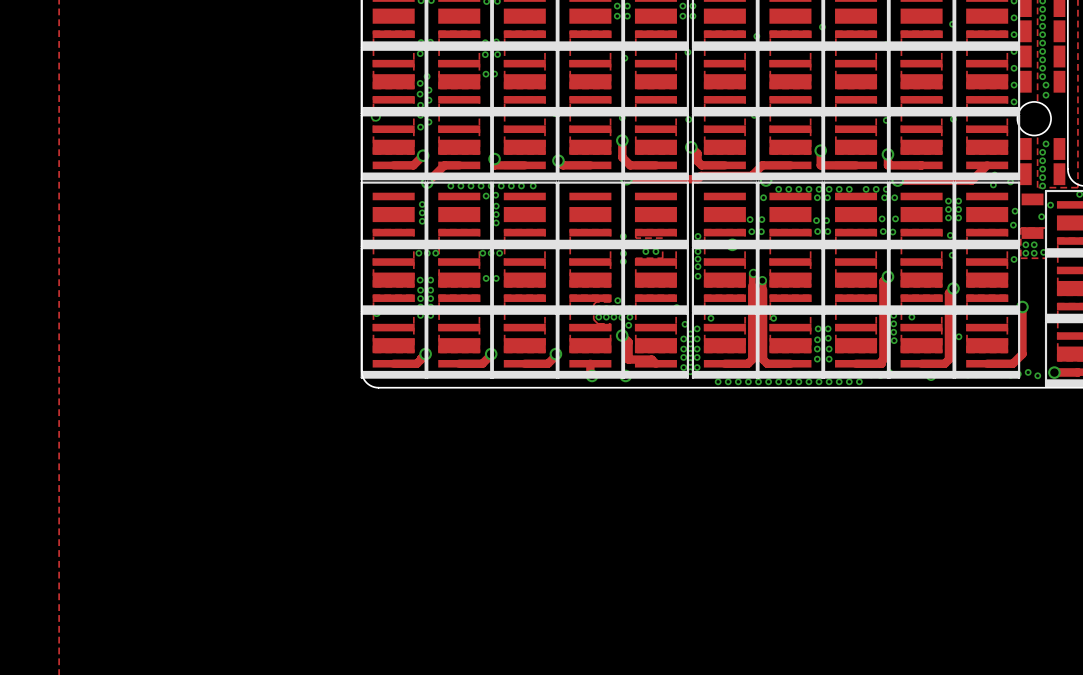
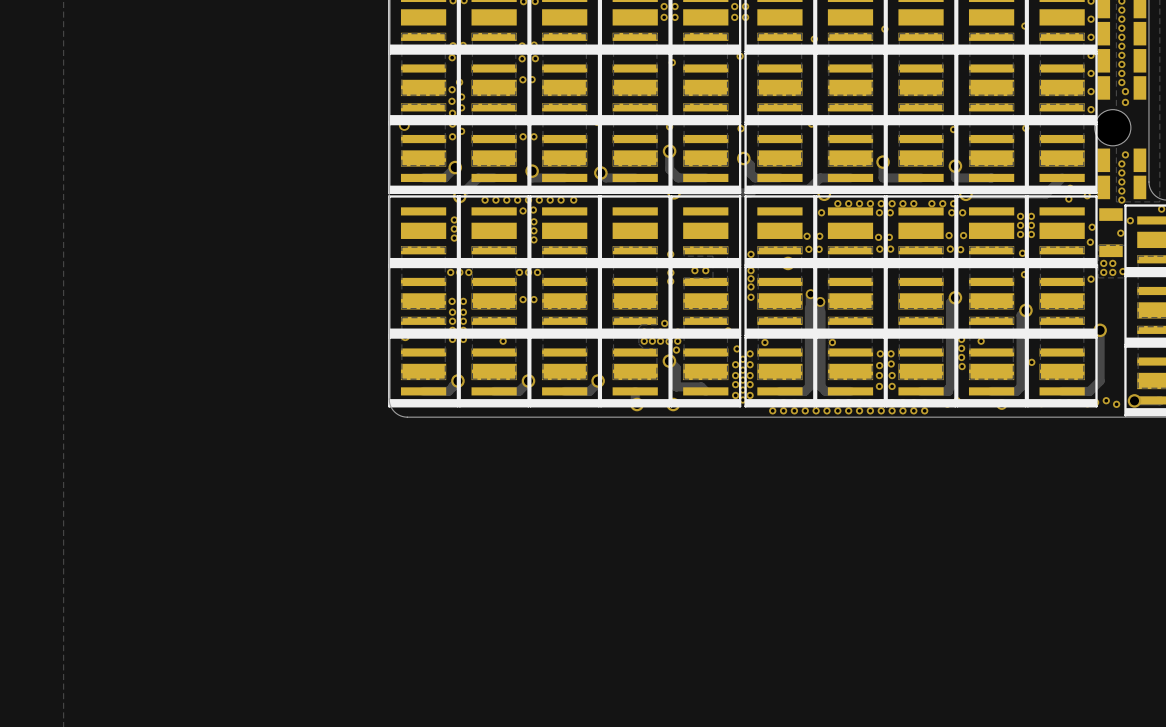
via: none -> (523, 136)
via: none -> (533, 136)
via: none -> (503, 341)

